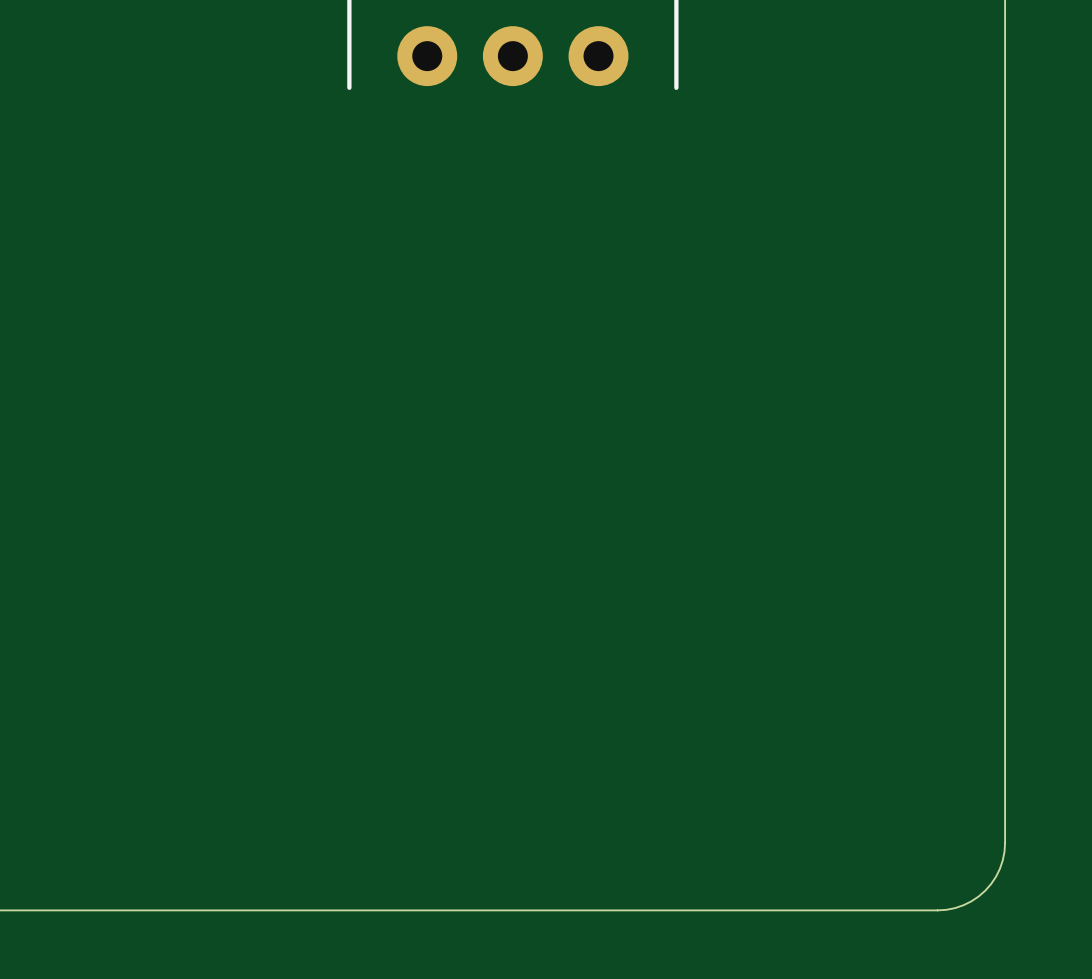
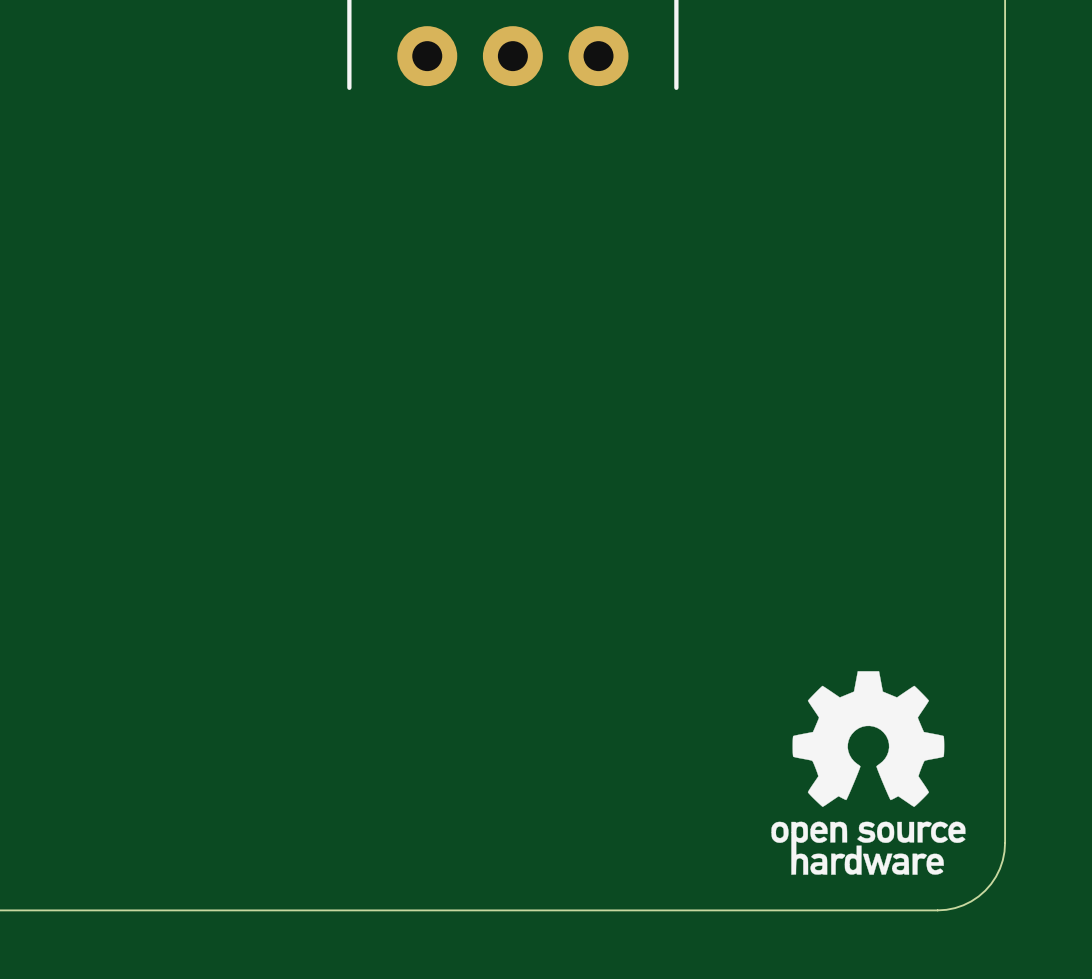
drawing: none -> [771, 671, 966, 875]

